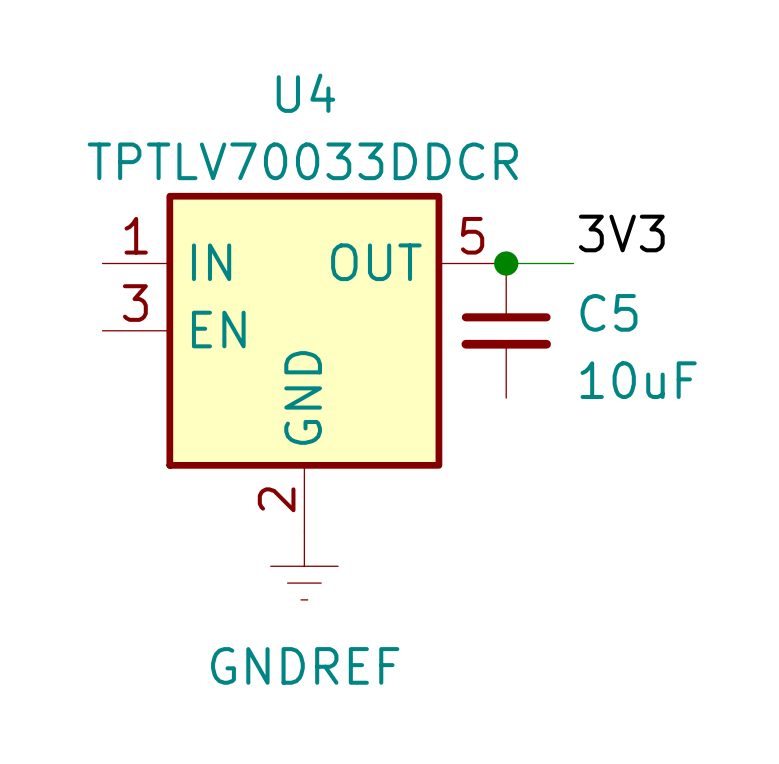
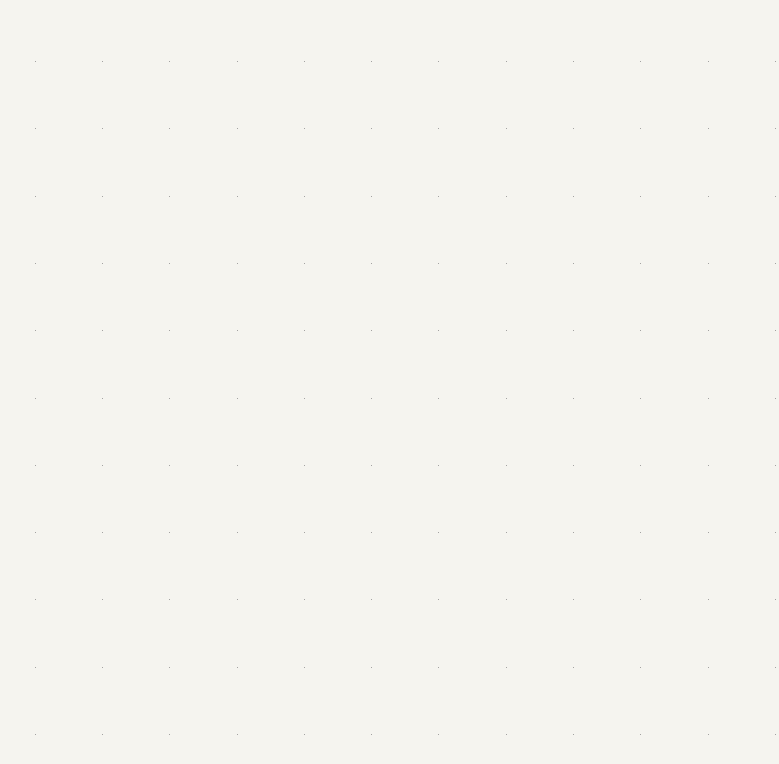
label: 3V3 (621, 233) -> none
wire: (506, 263) (573, 263) -> none
junction: (506, 263) -> none
C5: 10uF (506, 330) -> none
U4: TPTLV70033DDCR (304, 362) -> none
power symbol: GNDREF (304, 566) -> none

